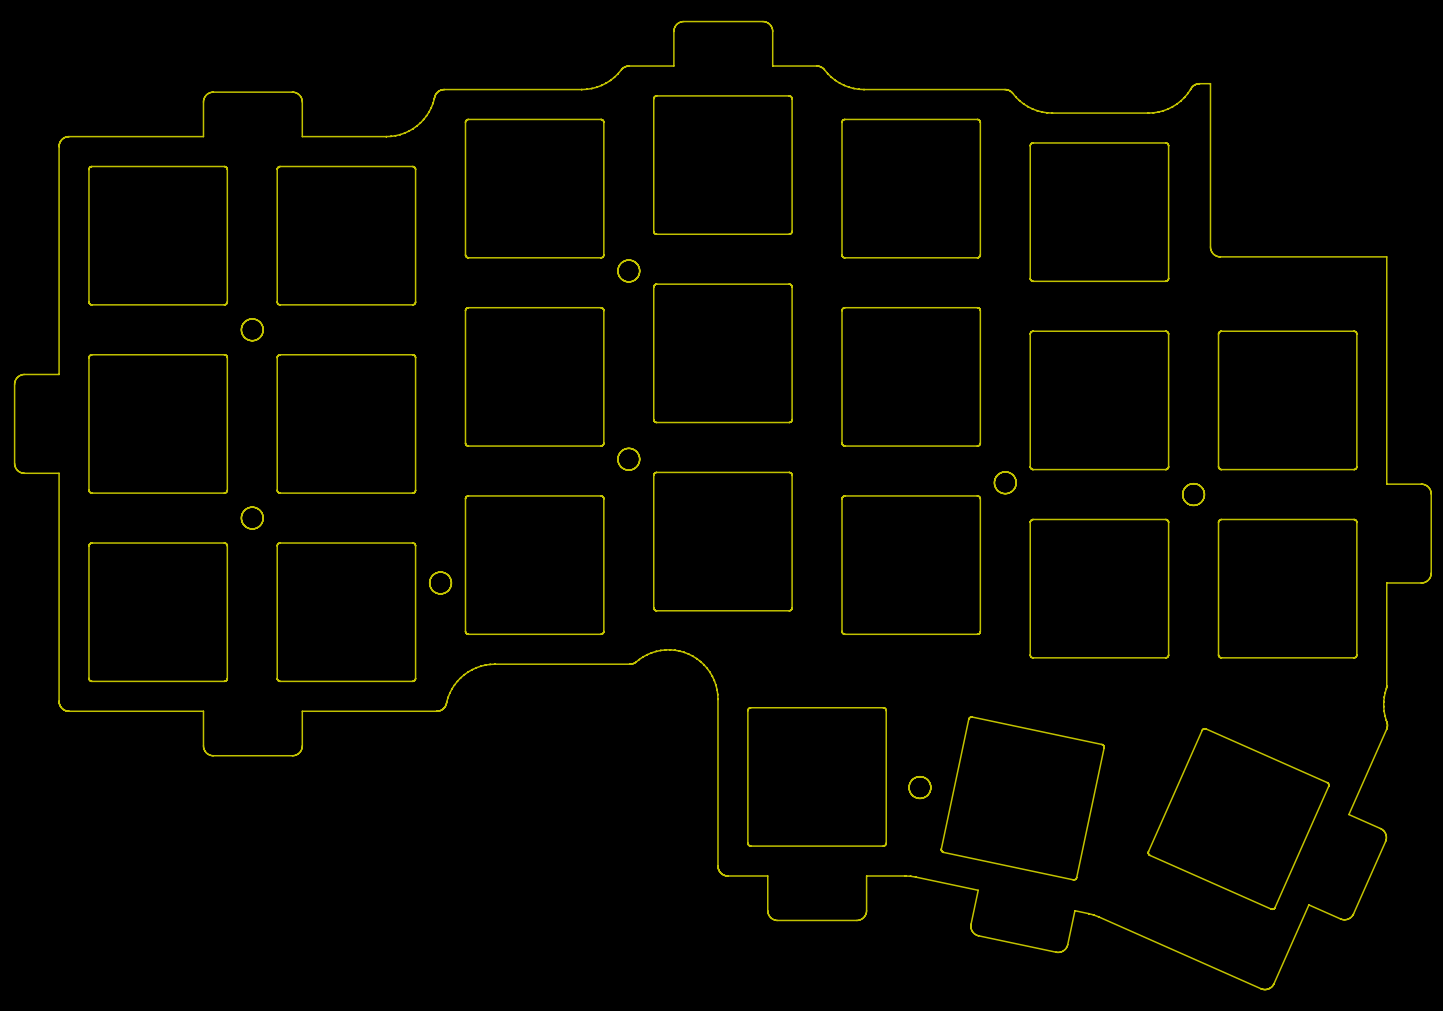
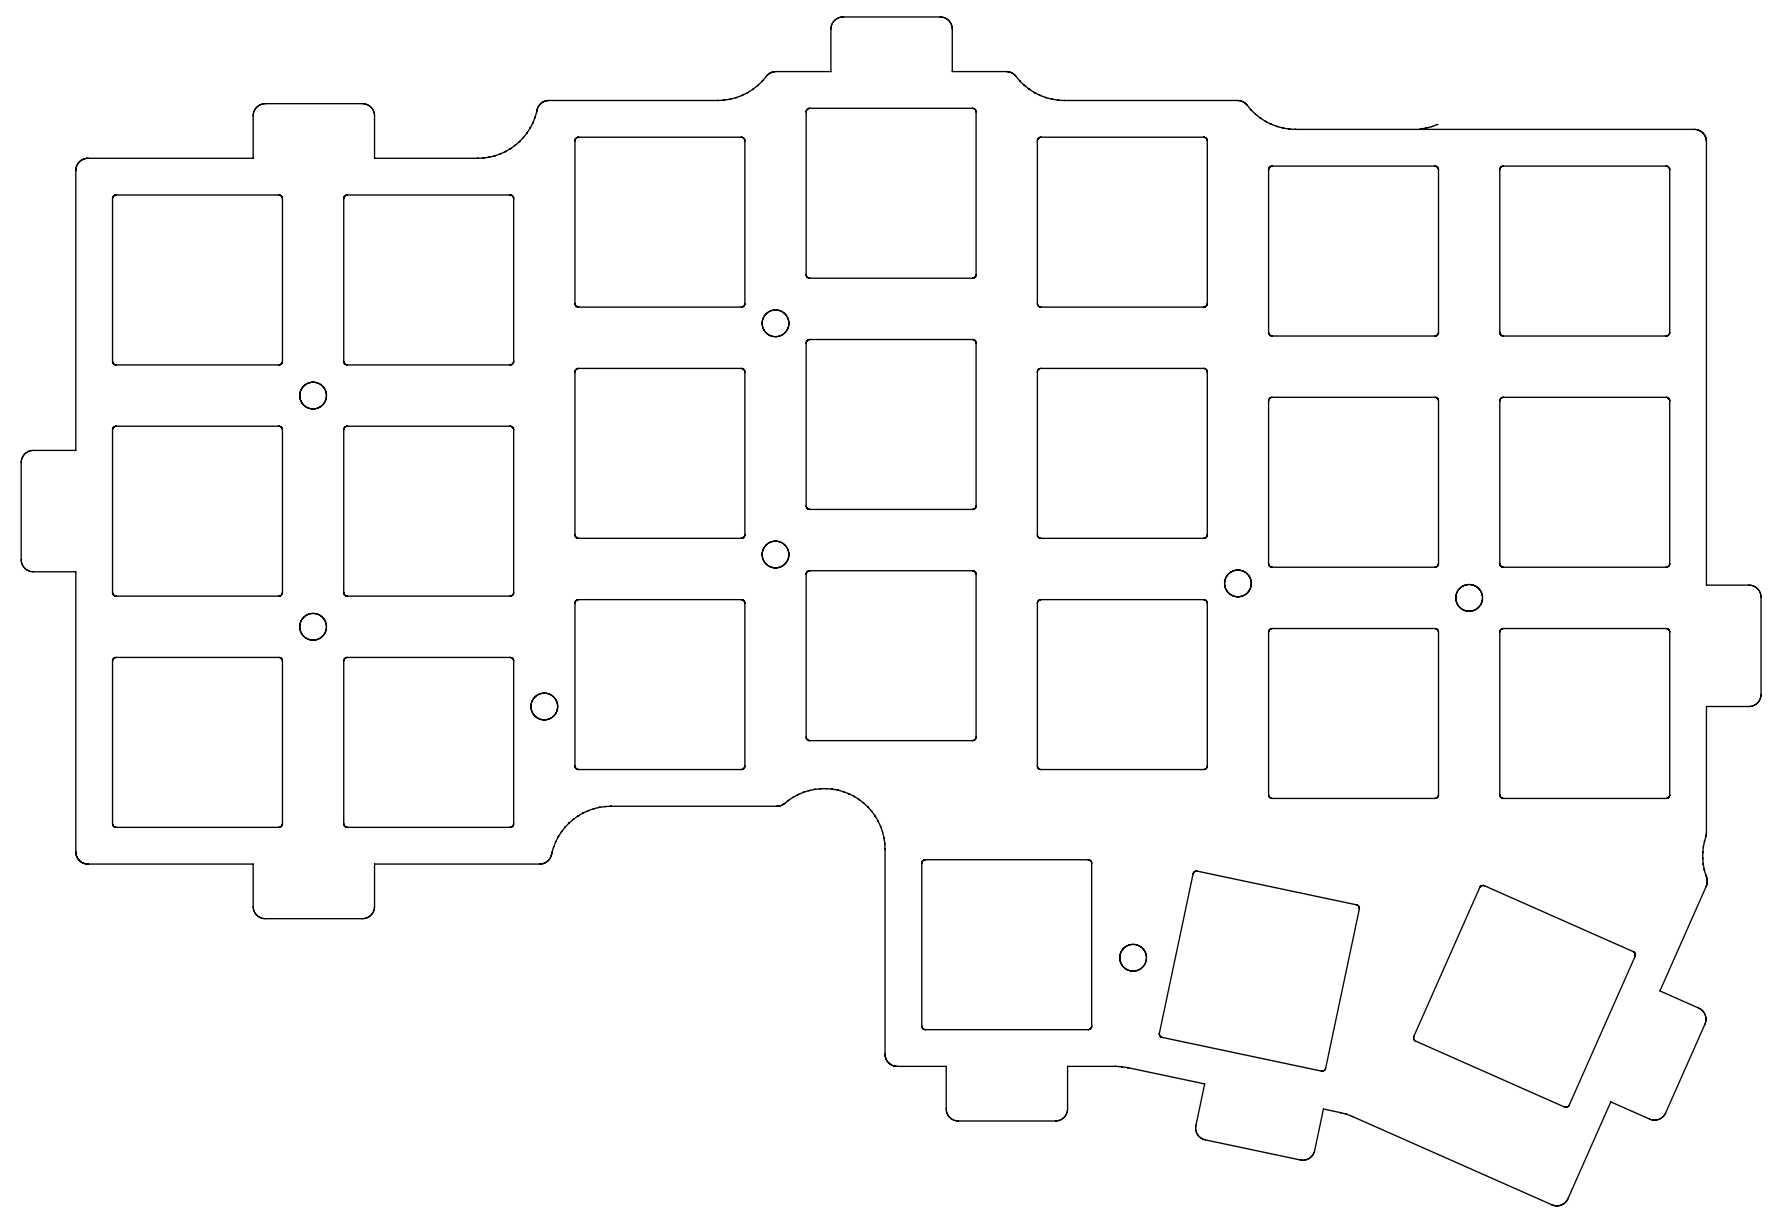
board edge: (1199, 83) (1210, 83) (1210, 246) (1213, 253) (1220, 256) (1386, 256) -> (1706, 141) (1706, 305)
board edge: (1199, 83) (1190, 89) -> none
board edge: (1190, 89) (1187, 93) -> none
board edge: (1187, 93) (1184, 97) -> none
board edge: (1184, 97) (1180, 100) -> none
board edge: (1180, 100) (1177, 103) -> none
board edge: (1176, 104) (1172, 106) -> none
board edge: (1172, 106) (1168, 108) -> none
board edge: (1153, 112) (1148, 113) -> (1694, 129) (1413, 129)
board edge: none -> (1694, 129) (1702, 132) (1706, 141)
board edge: none -> (1502, 166) (1499, 169) (1500, 334) (1668, 334) (1668, 167) (1502, 166)

